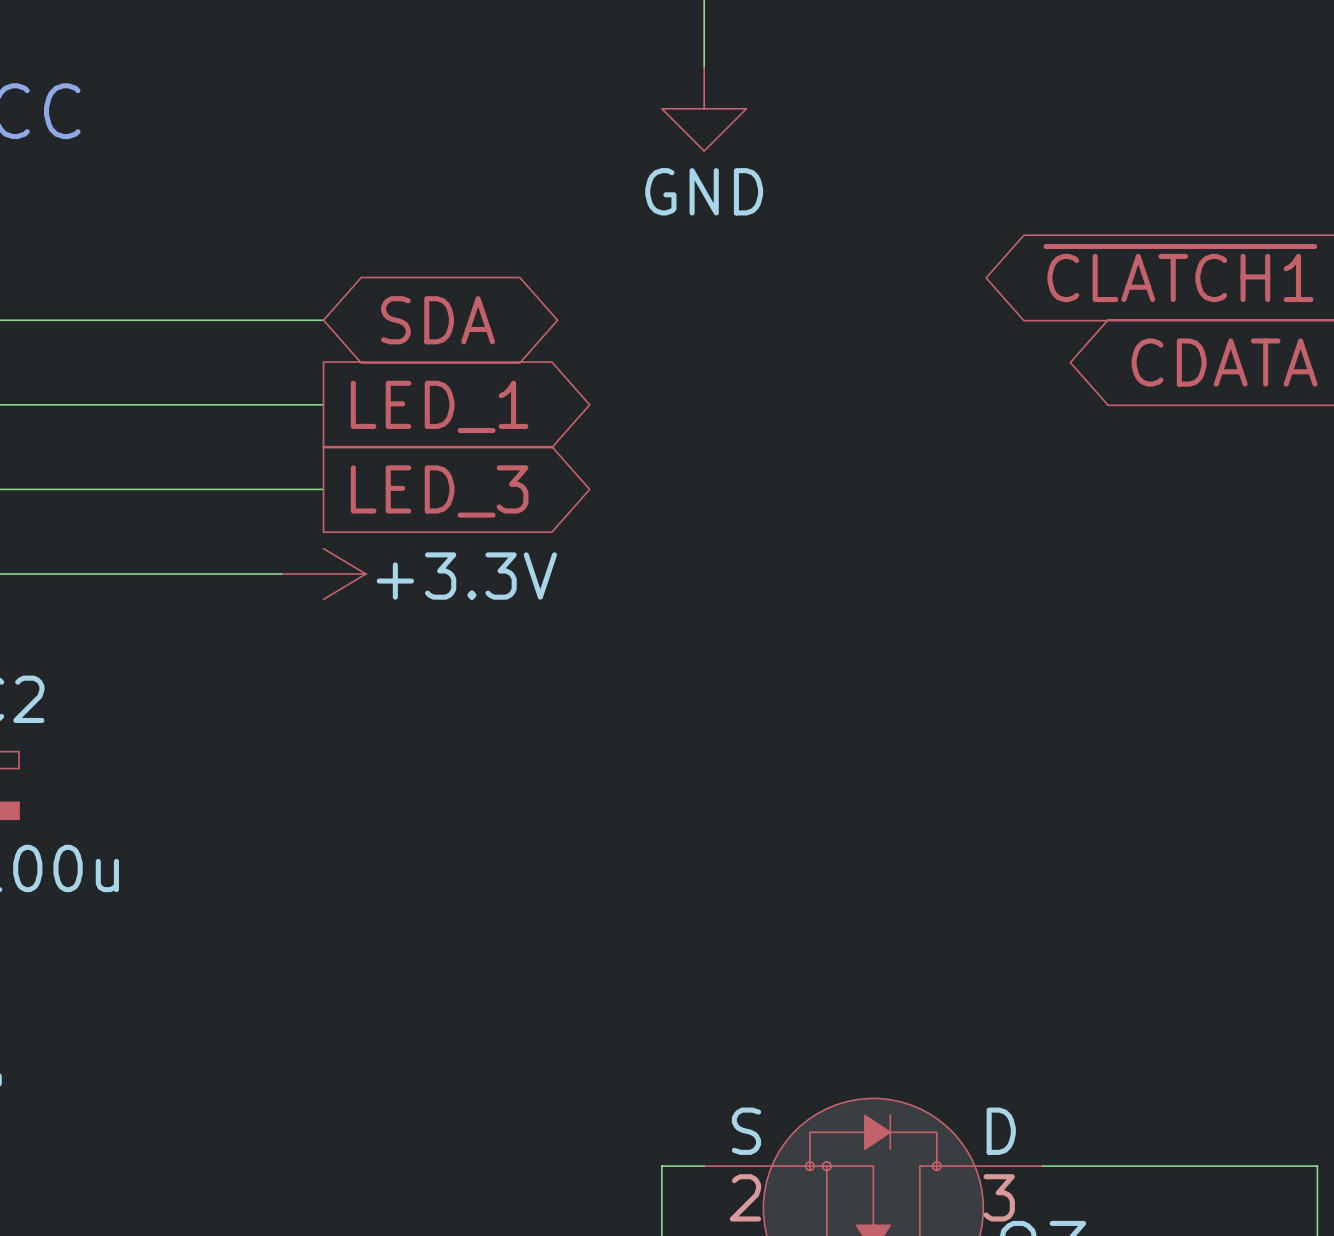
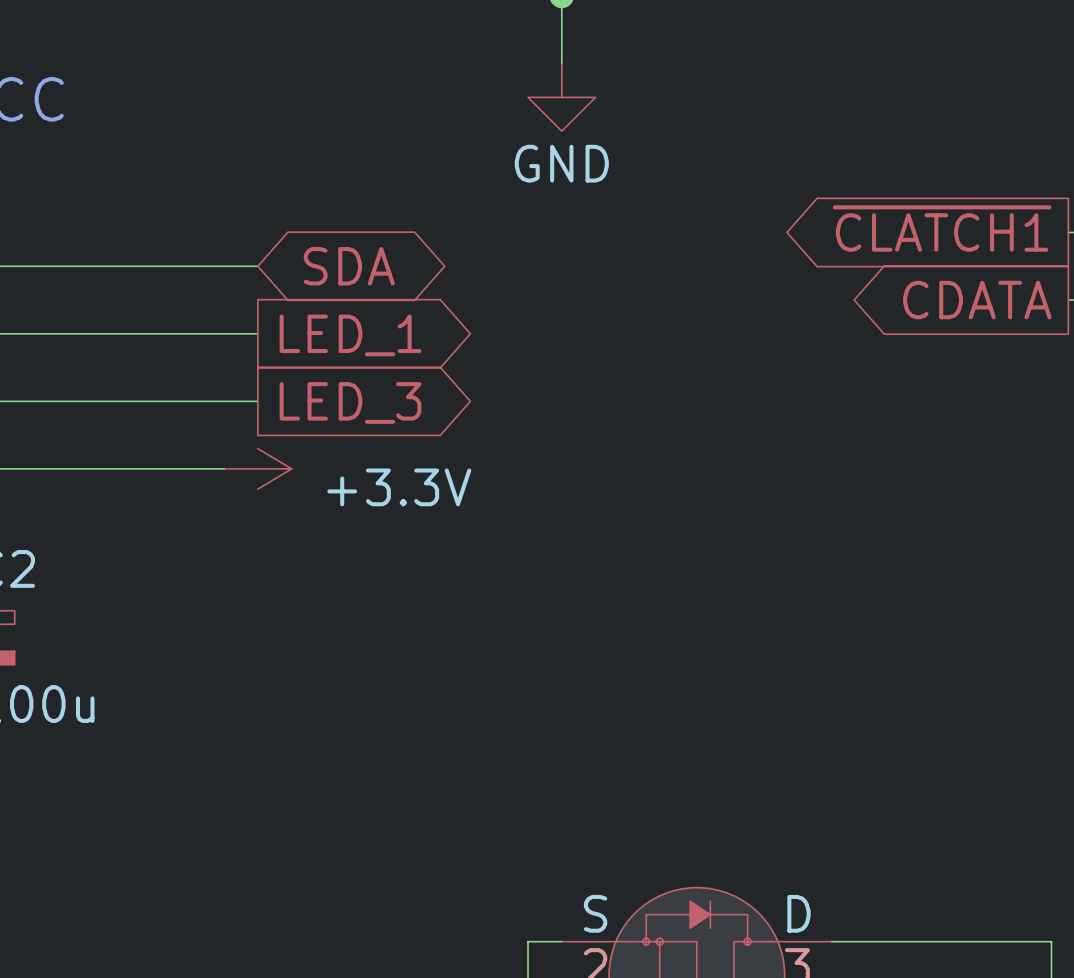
power symbol text position: +3.3V (466, 576) -> +3.3V (399, 487)

